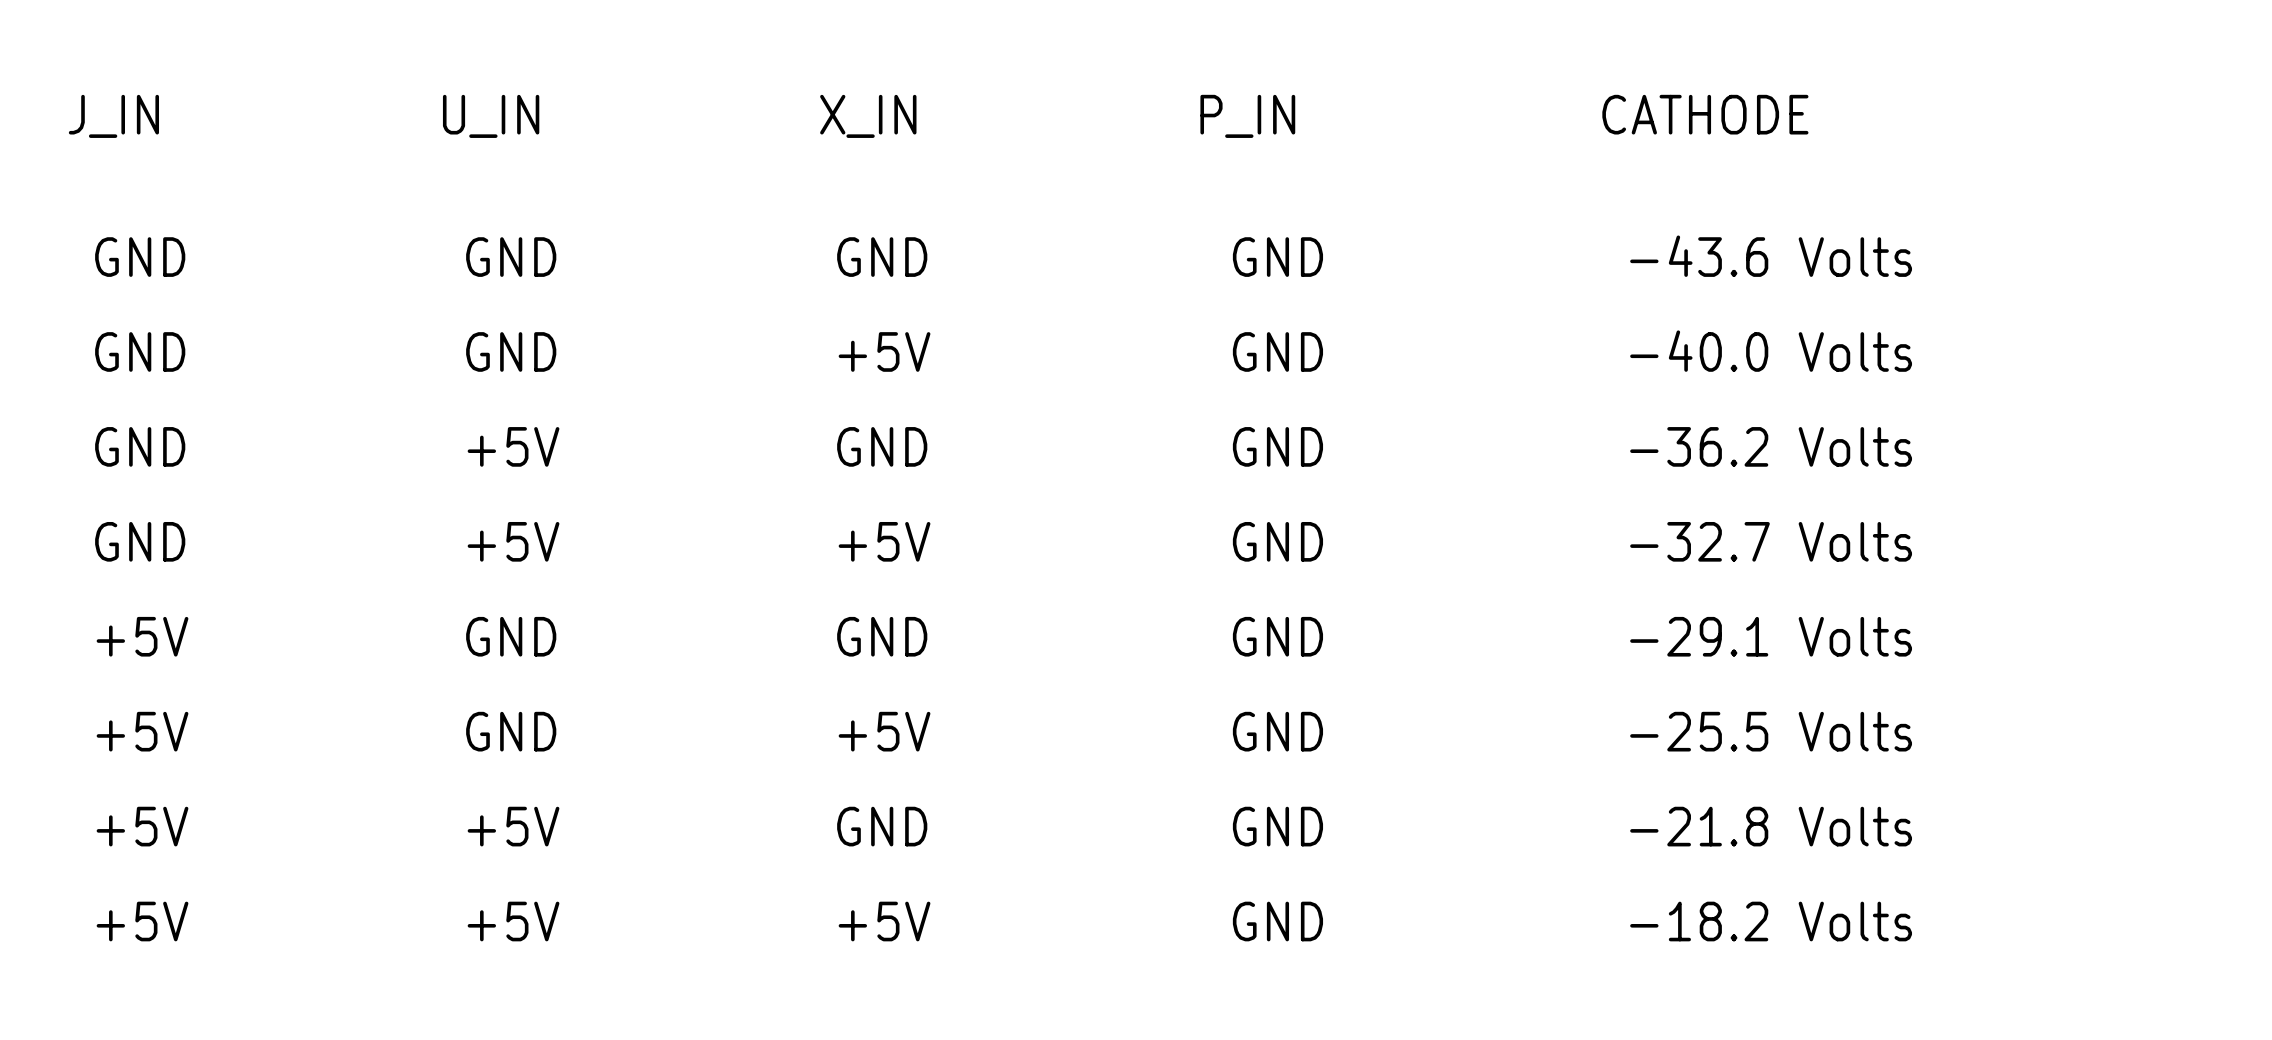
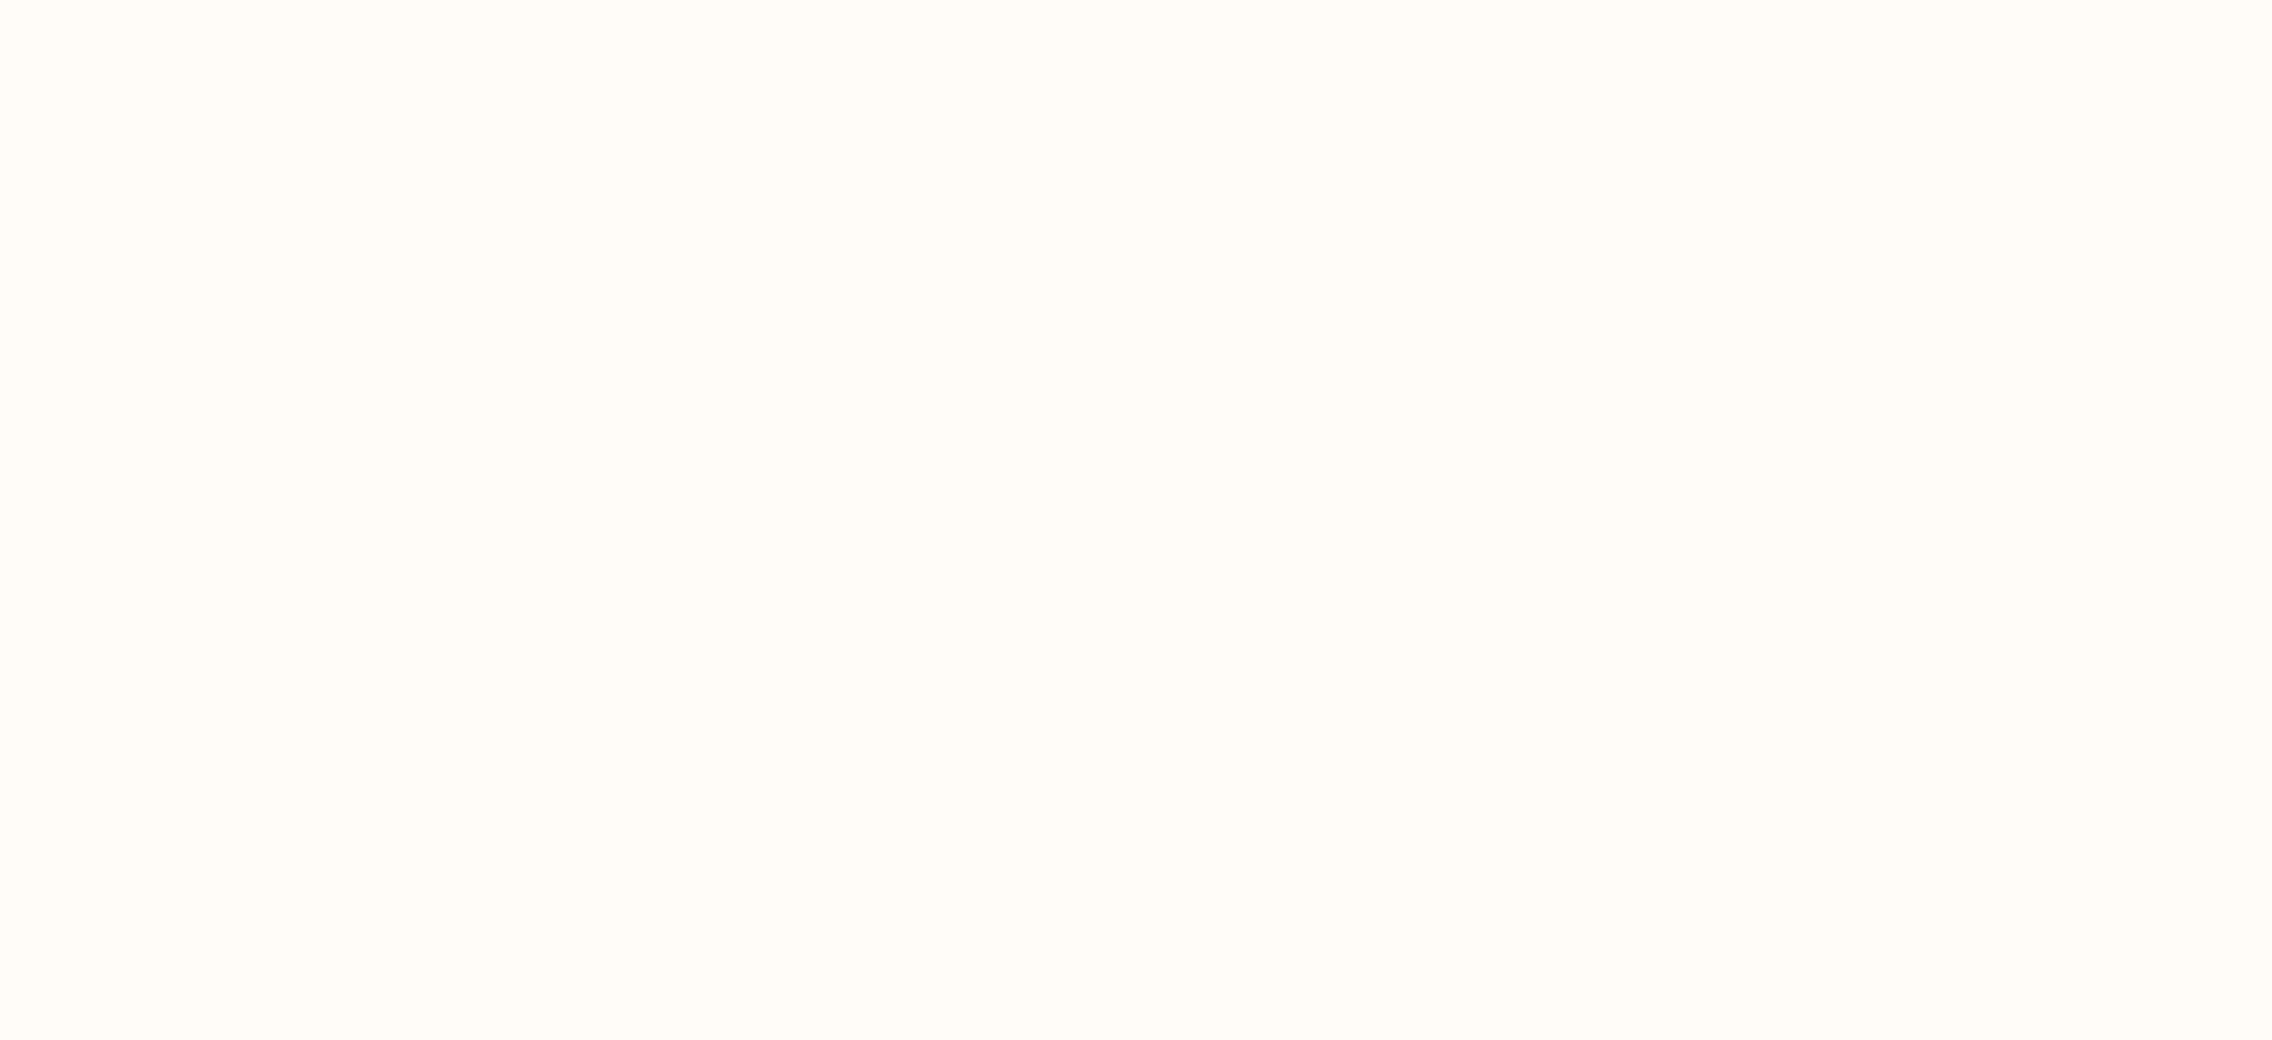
text: J_IN U_IN X_IN P_IN CATHODE (938, 116) -> none
text: GND GND GND GND -43.6 Volts (1003, 256) -> none
text: GND GND +5V GND -40.0 Volts (1003, 351) -> none
text: GND +5V GND GND -36.2 Volts (1003, 446) -> none
text: GND +5V +5V GND -32.7 Volts (1003, 541) -> none
text: +5V GND GND GND -29.1 Volts (1004, 636) -> none
text: +5V GND +5V GND -25.5 Volts (1004, 731) -> none
text: +5V +5V GND GND -21.8 Volts (1004, 826) -> none
text: +5V +5V +5V GND -18.2 Volts (1004, 921) -> none

